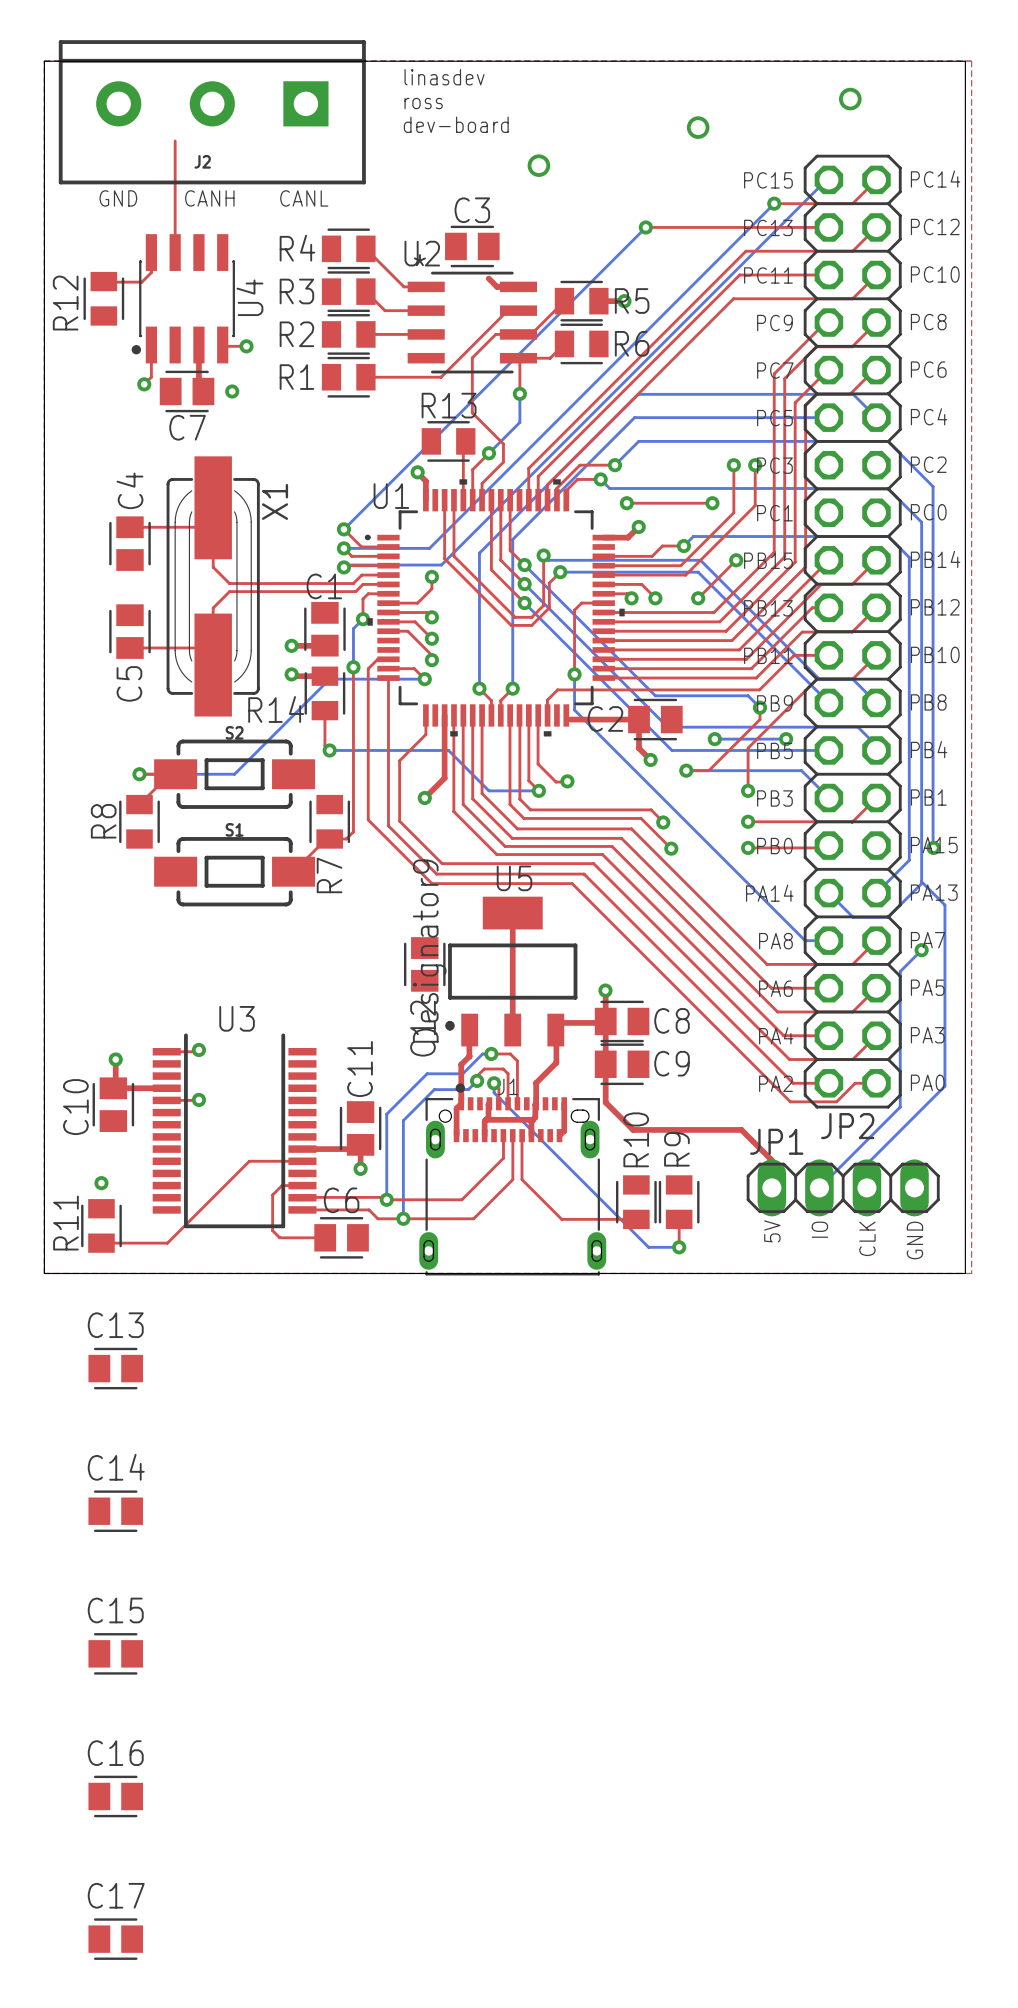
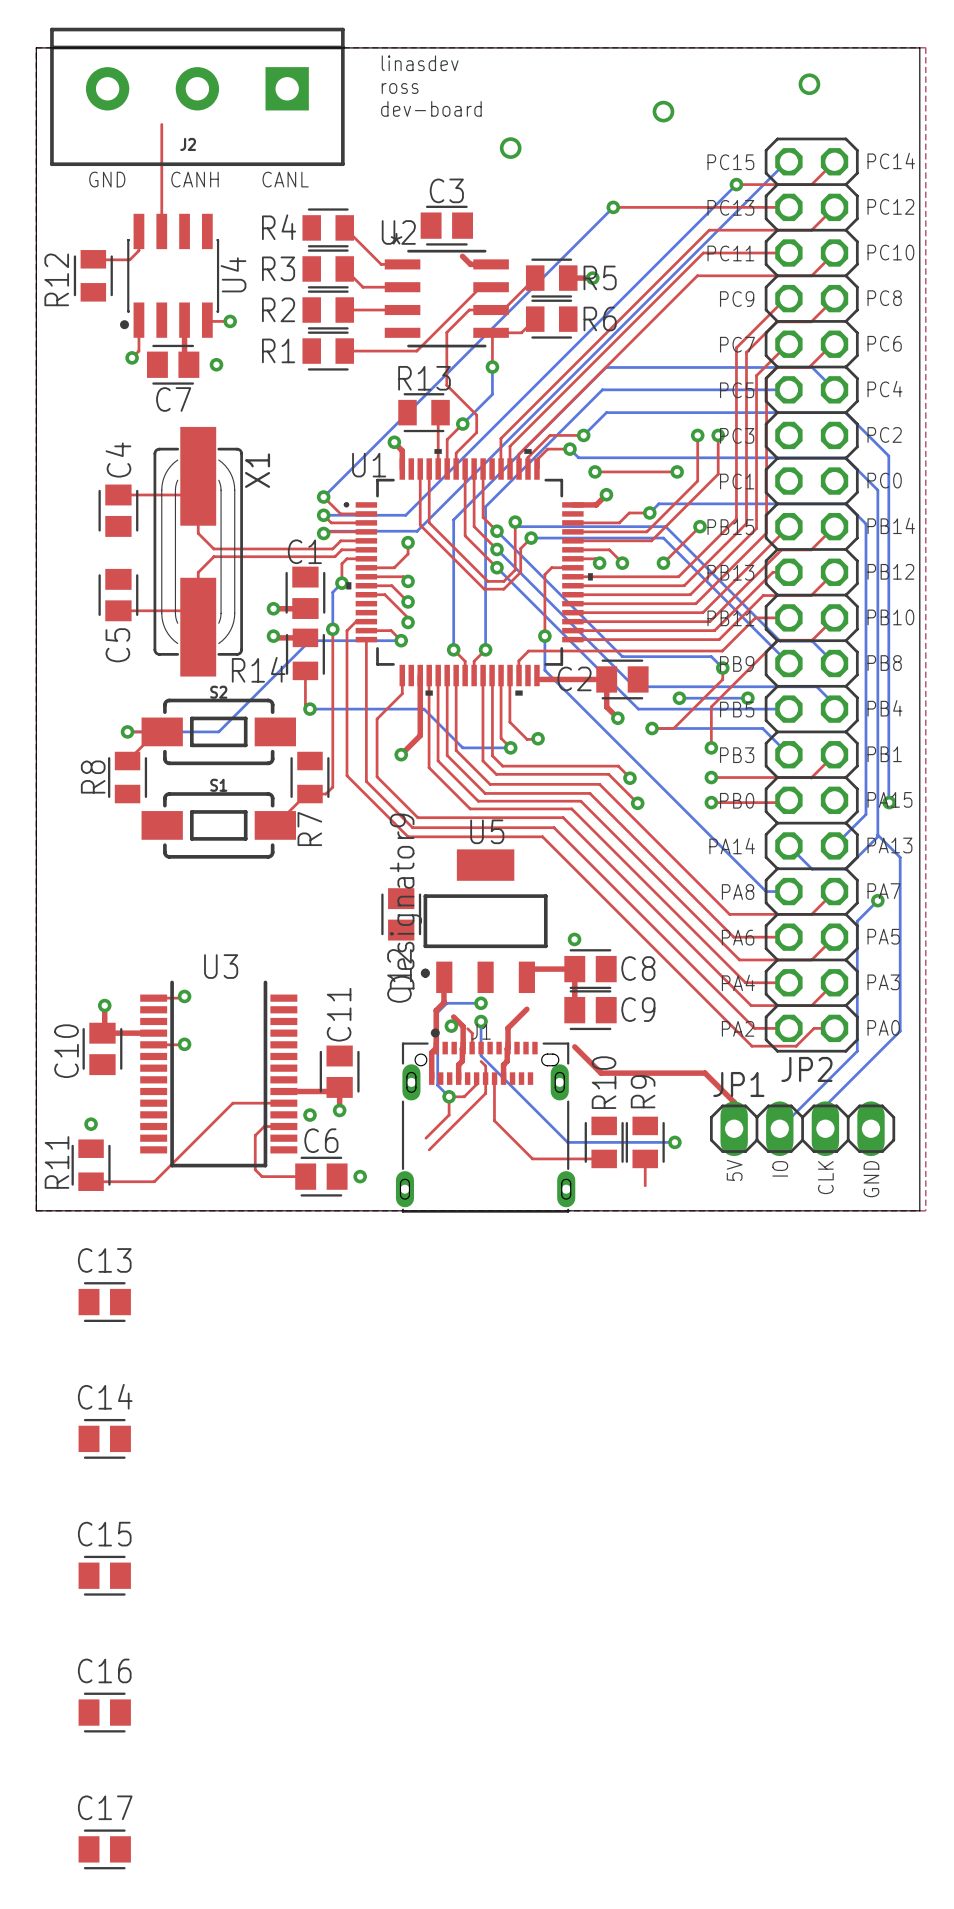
top track: (512, 913) (512, 1030) -> none
top track: (605, 990) (604, 1022) (555, 1022) -> (574, 969) (526, 970)
top track: (555, 1030) (555, 1063) -> none
top track: (491, 1053) (510, 1053) (517, 1061) (517, 1103) -> none
bottom track: (491, 1053) (482, 1053) (462, 1073) (427, 1073) (386, 1114) (386, 1199) -> none
via: (491, 1053) -> none
bottom track: none -> (481, 1003) (446, 1003) (437, 1012) (437, 1085) (449, 1096)
via: none -> (481, 1003)
top track: (605, 1064) (605, 1102) -> none
top track: none -> (453, 1016) (463, 1026) (463, 1048)
bottom track: none -> (481, 1021) (481, 1055) (567, 1142) (674, 1142)
top track: (477, 1080) (477, 1076) (484, 1069) (503, 1069) (508, 1073) (508, 1103) -> none
bottom track: (477, 1080) (468, 1089) (434, 1089) (403, 1120) (403, 1218) -> none
bottom track: (494, 1083) (494, 1092) (648, 1247) (679, 1247) -> none
via position: (494, 1083) -> (481, 1021)
top track: (564, 1103) (564, 1130) (559, 1135) -> none
top track: none -> (481, 1061) (485, 1066) (485, 1078)
top track: (486, 1119) (532, 1119) -> none
top track: (503, 1141) (503, 1158) (461, 1199) (302, 1197) -> (476, 1084) (464, 1096) (449, 1096) (449, 1115) (425, 1138)
top track: (512, 1151) (512, 1179) (473, 1218) (377, 1218) (369, 1209) (302, 1209) -> (485, 1093) (429, 1149)
via: none -> (449, 1096)
via: none -> (309, 1115)
via: (386, 1199) -> none
via: (403, 1218) -> none
via: none -> (360, 1176)
via position: (679, 1247) -> (674, 1142)

